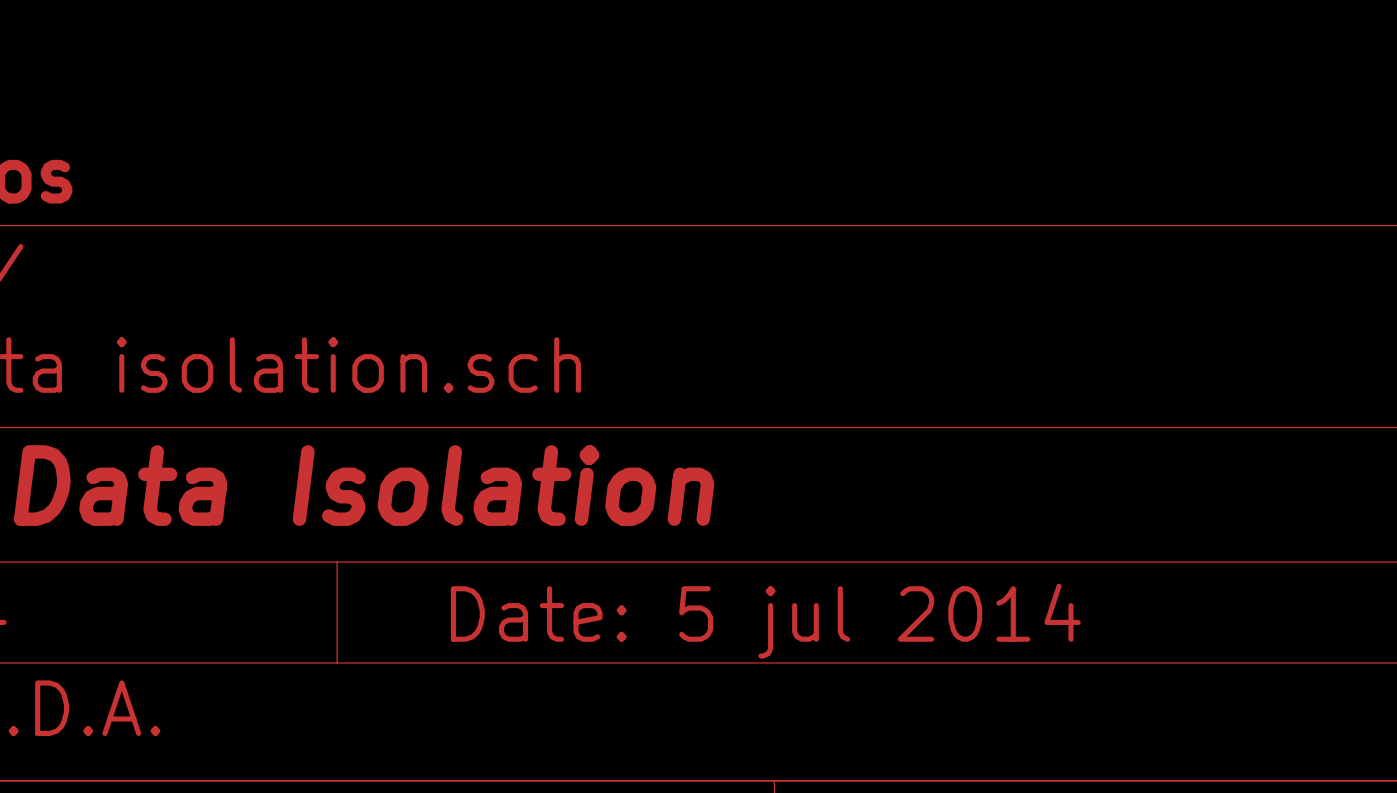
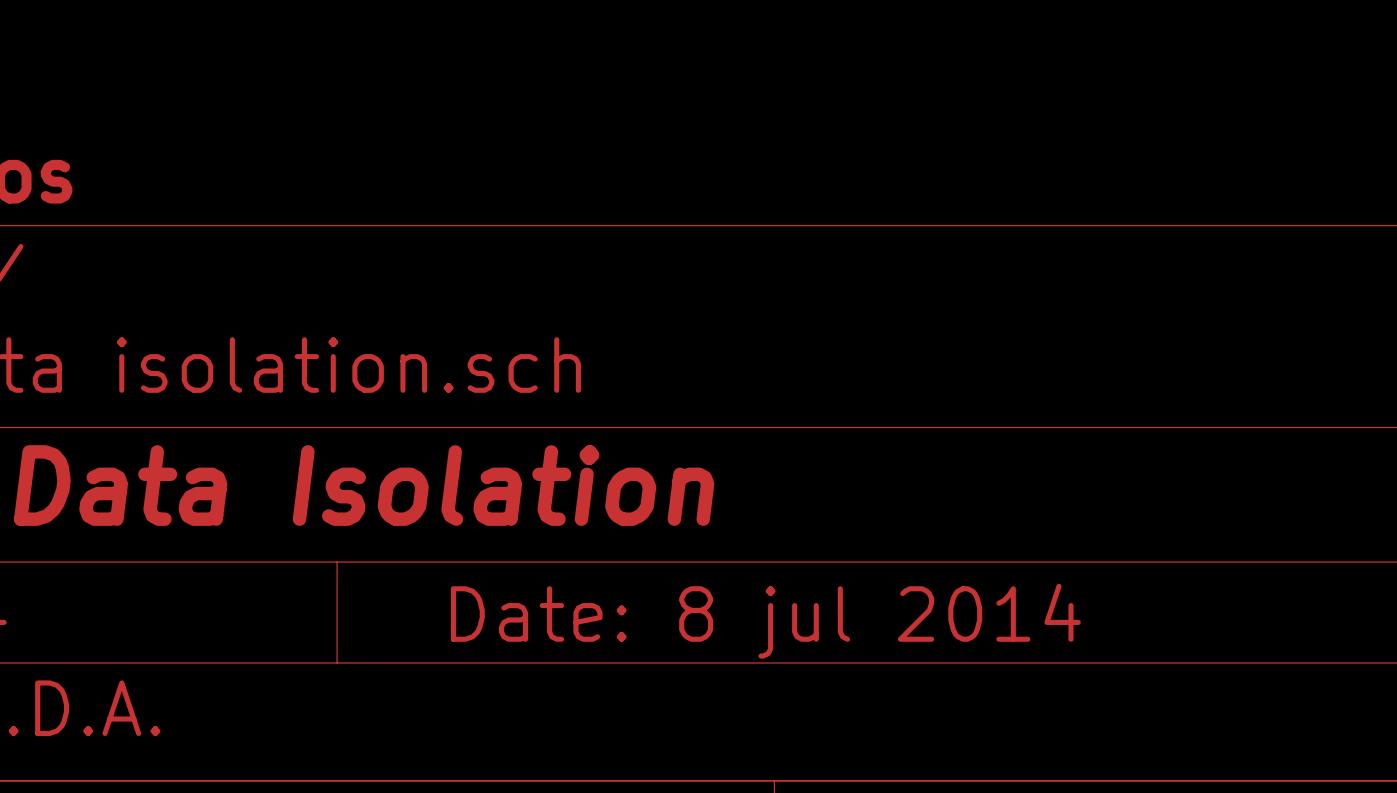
title block: Date: 5 jul 2014 (765, 621) -> Date: 8 jul 2014 (765, 621)

